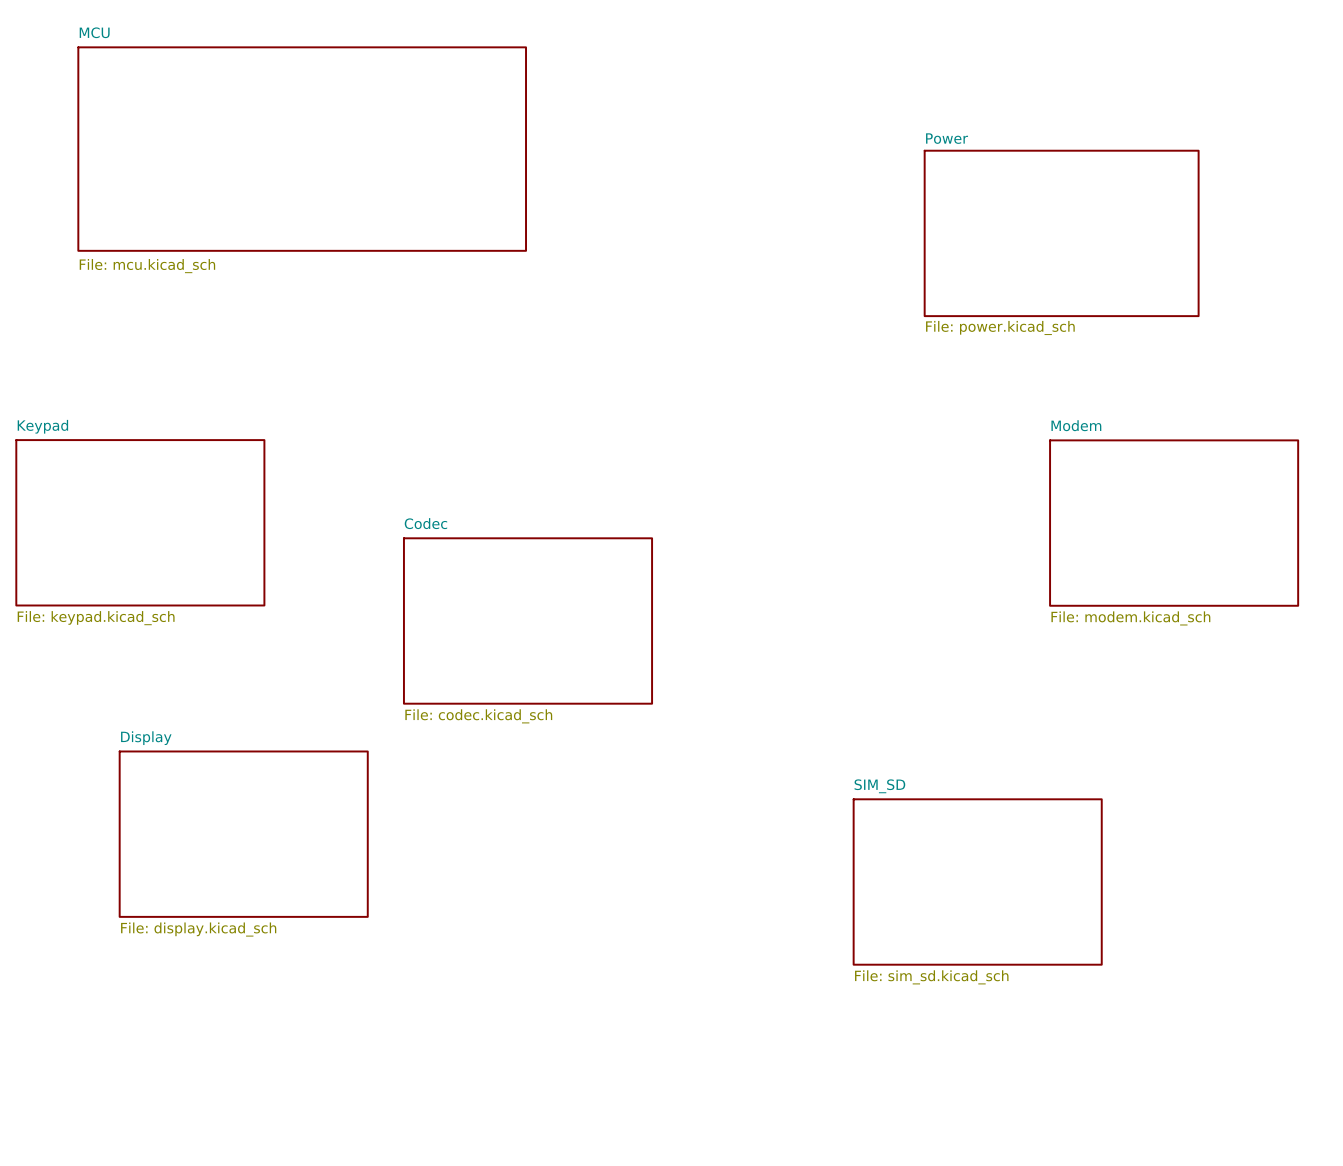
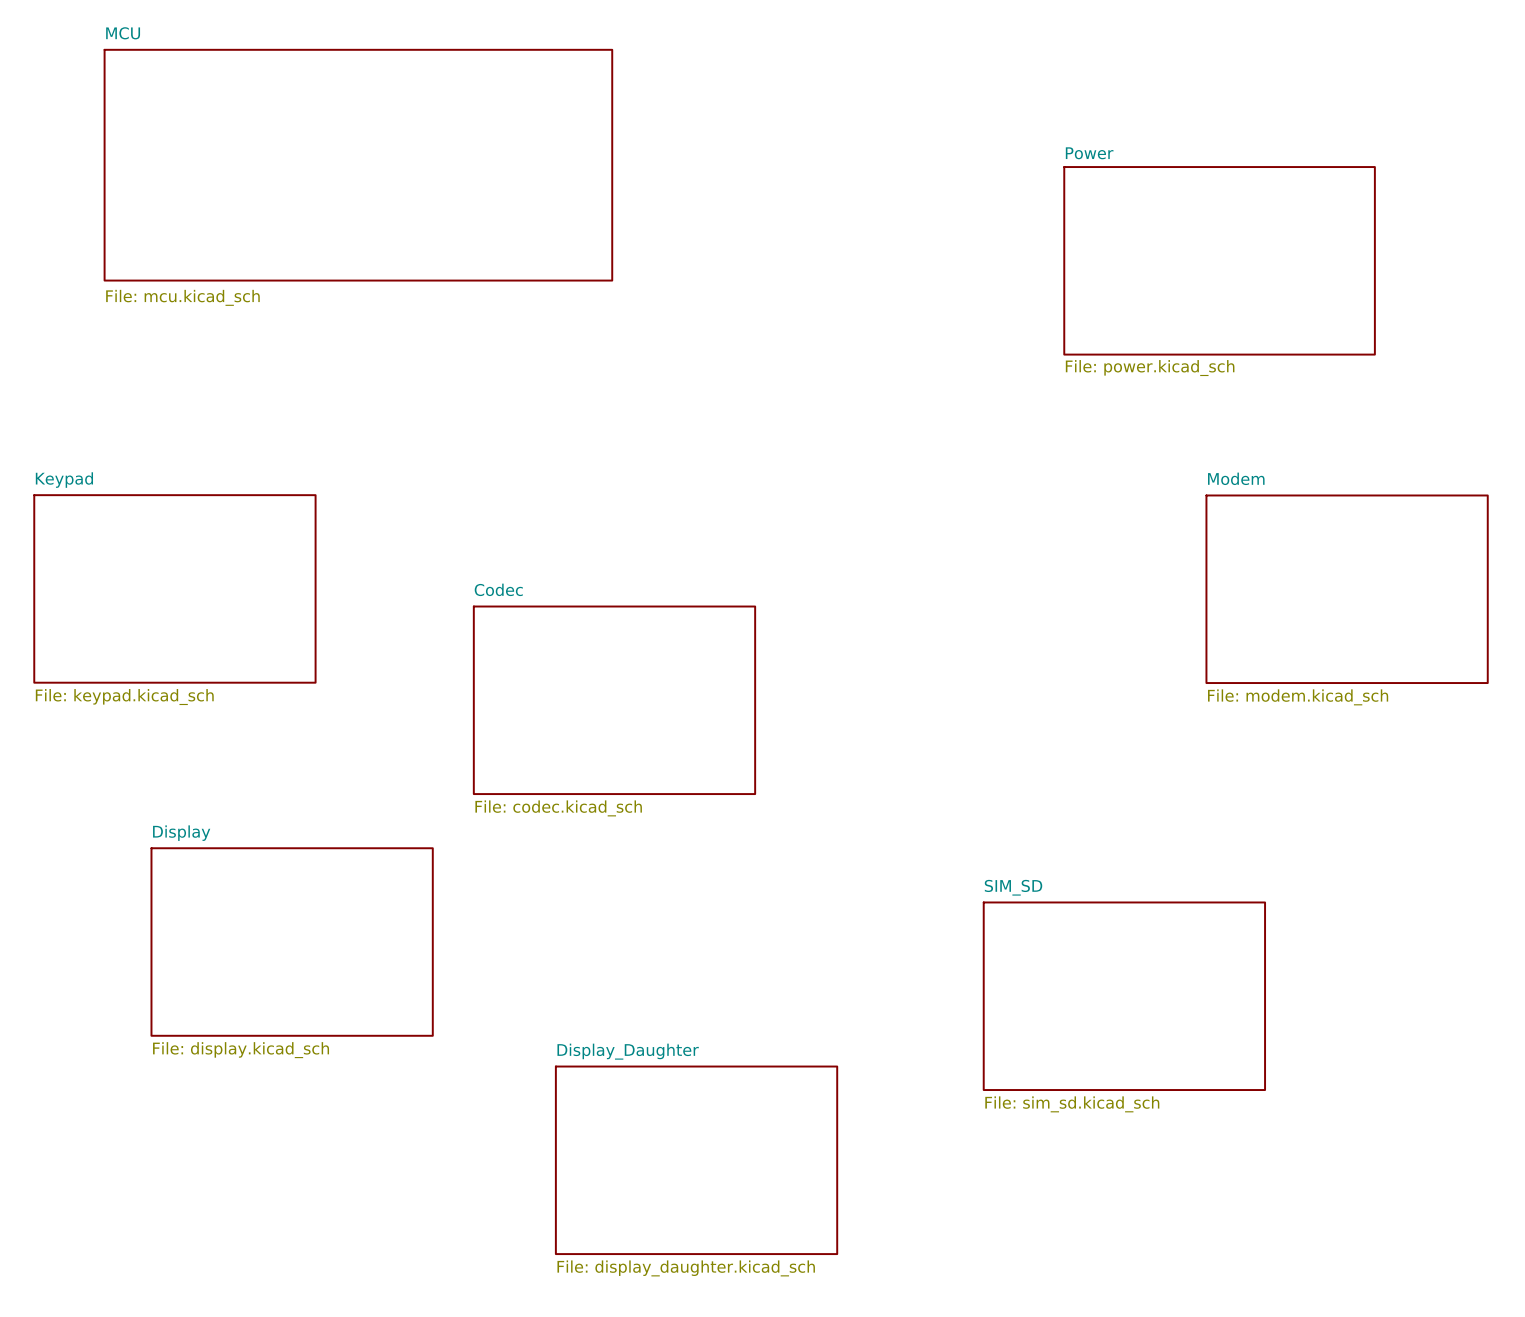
sheet Display_Daughter: none -> File: display_daughter.kicad_sch (696, 1160)

